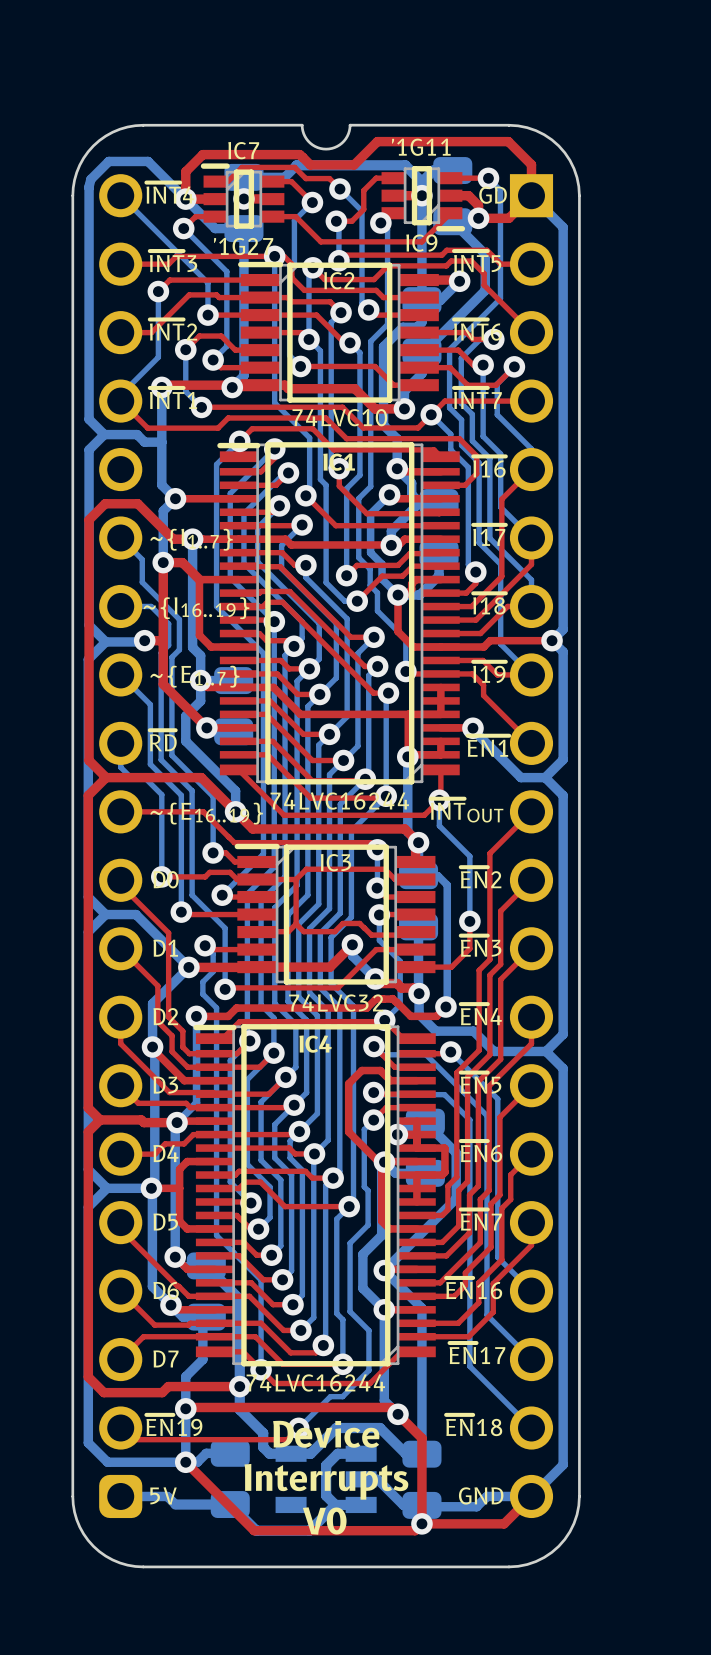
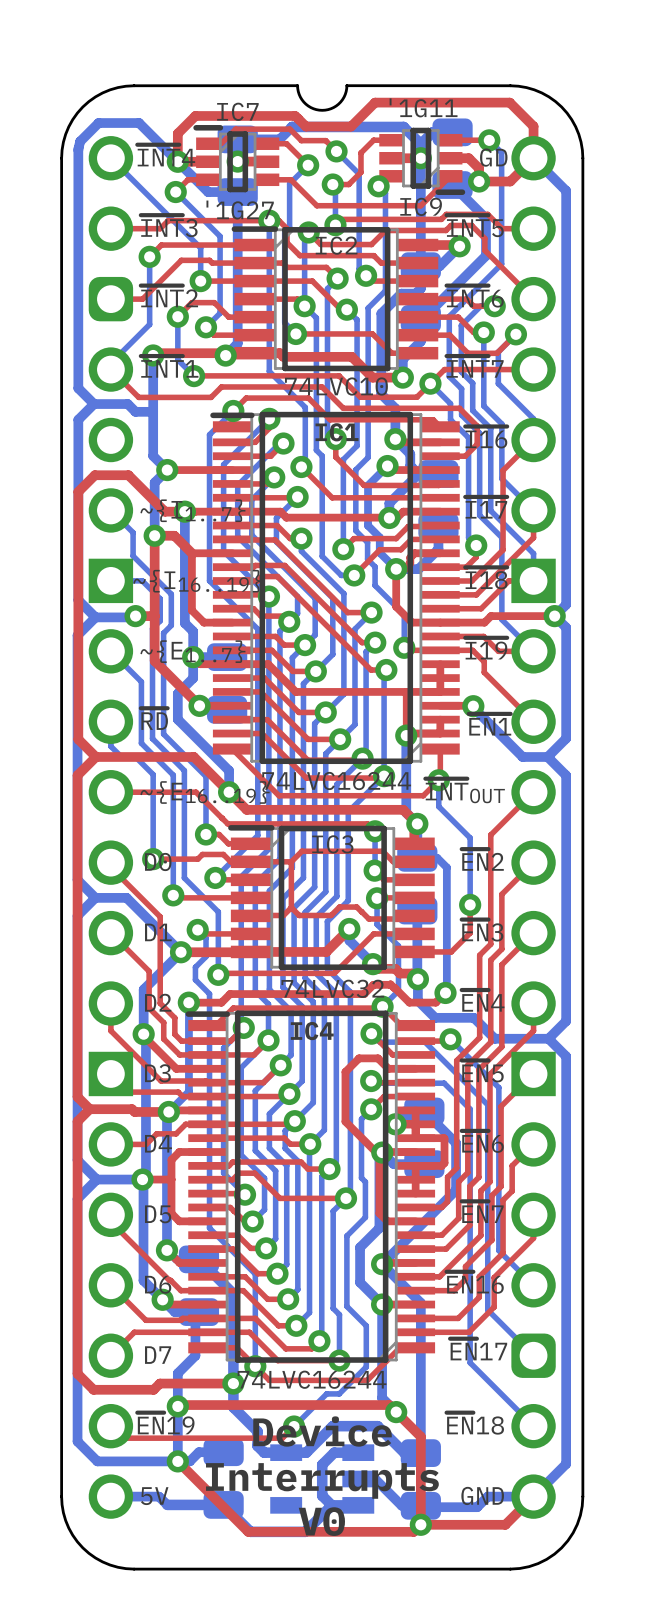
part footprint: [71, 123, 581, 1569] -> [60, 84, 585, 1571]

